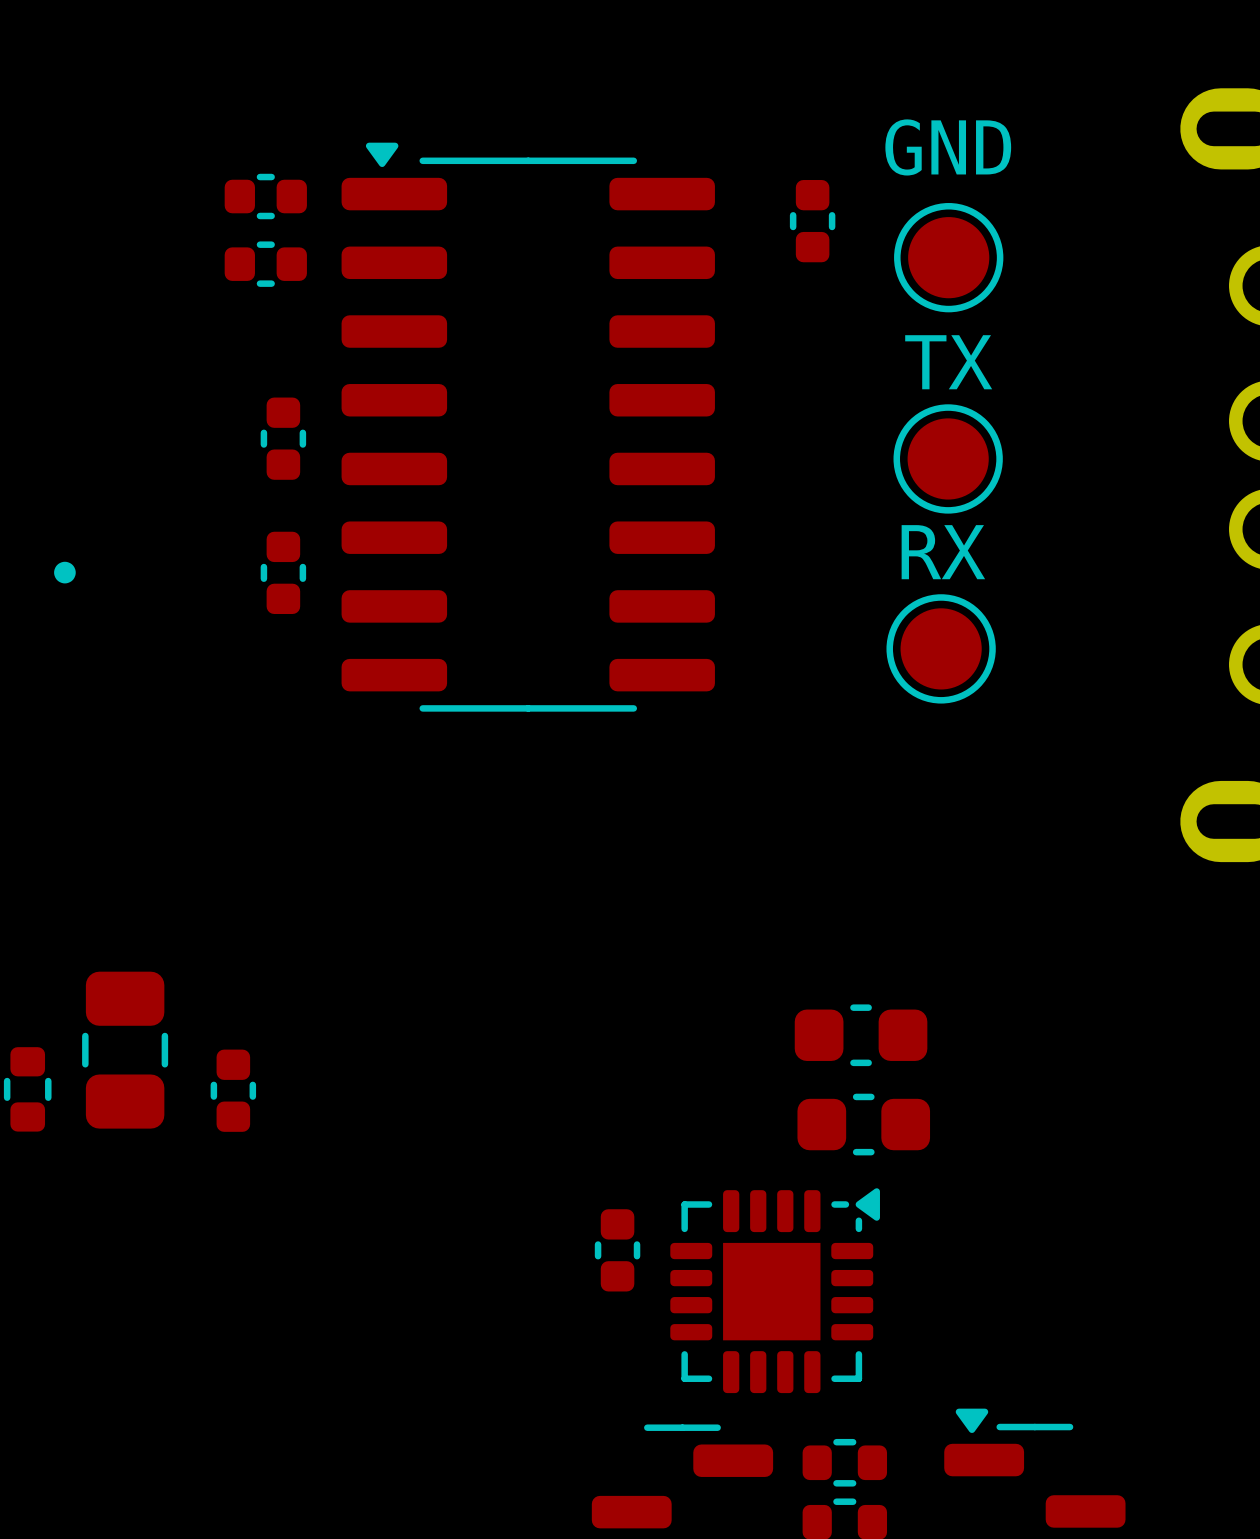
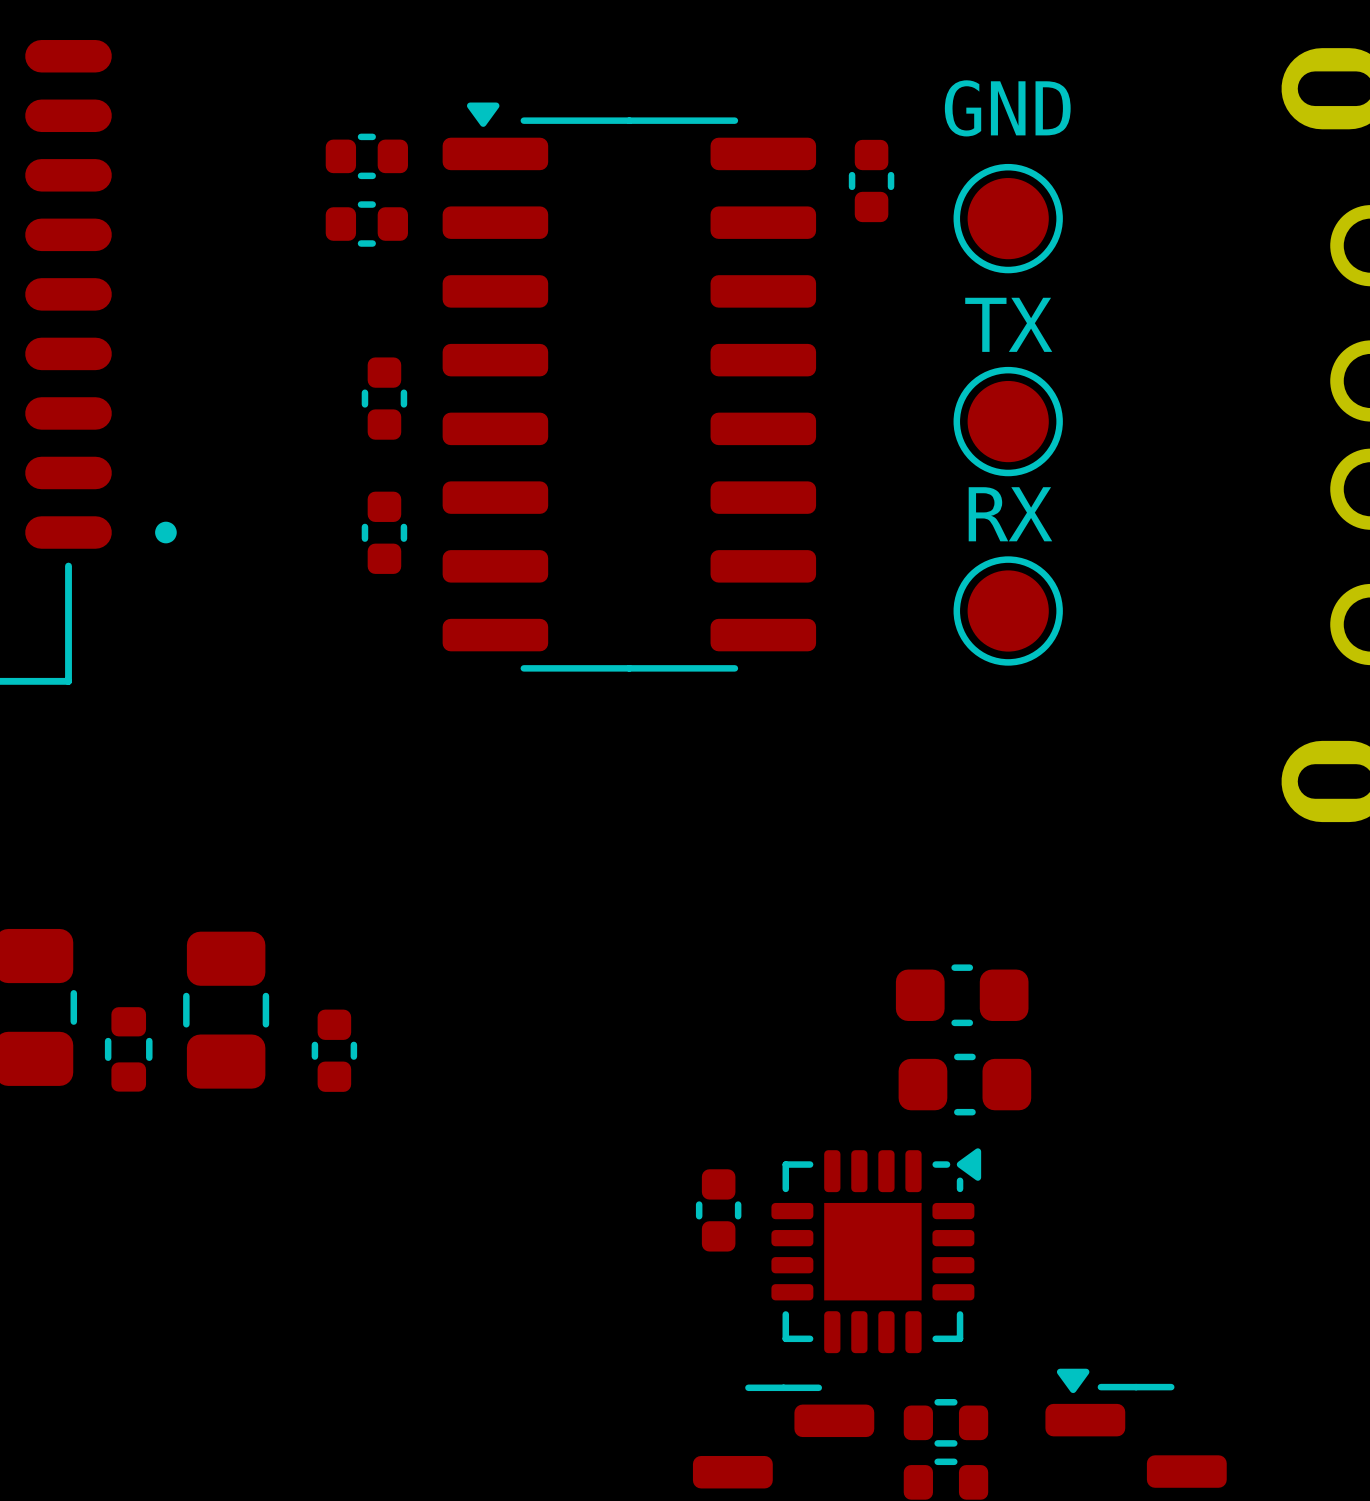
part position: (812, 221) -> (871, 180)
part position: (948, 257) -> (1008, 218)
part position: (948, 458) -> (1008, 421)
part position: (941, 648) -> (1008, 611)

